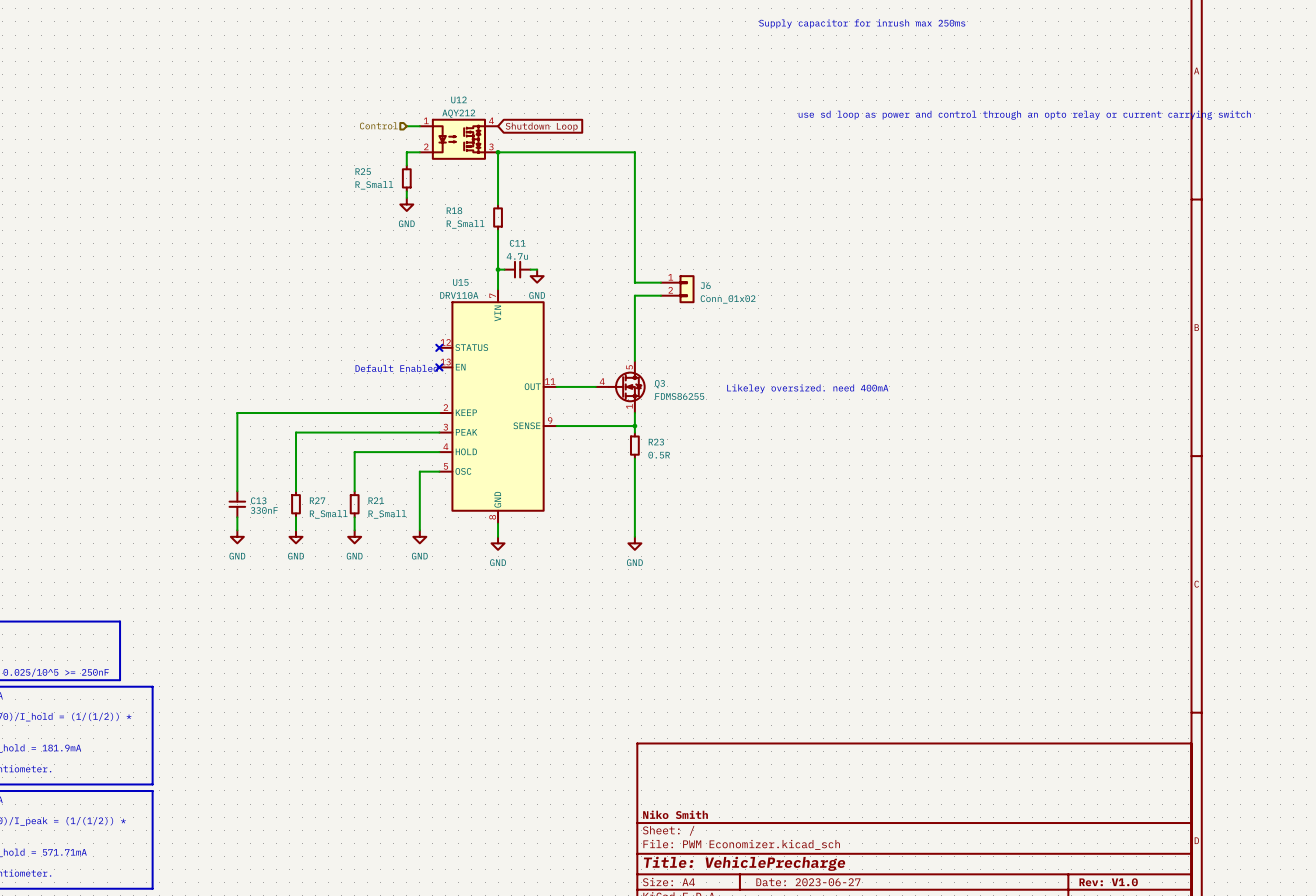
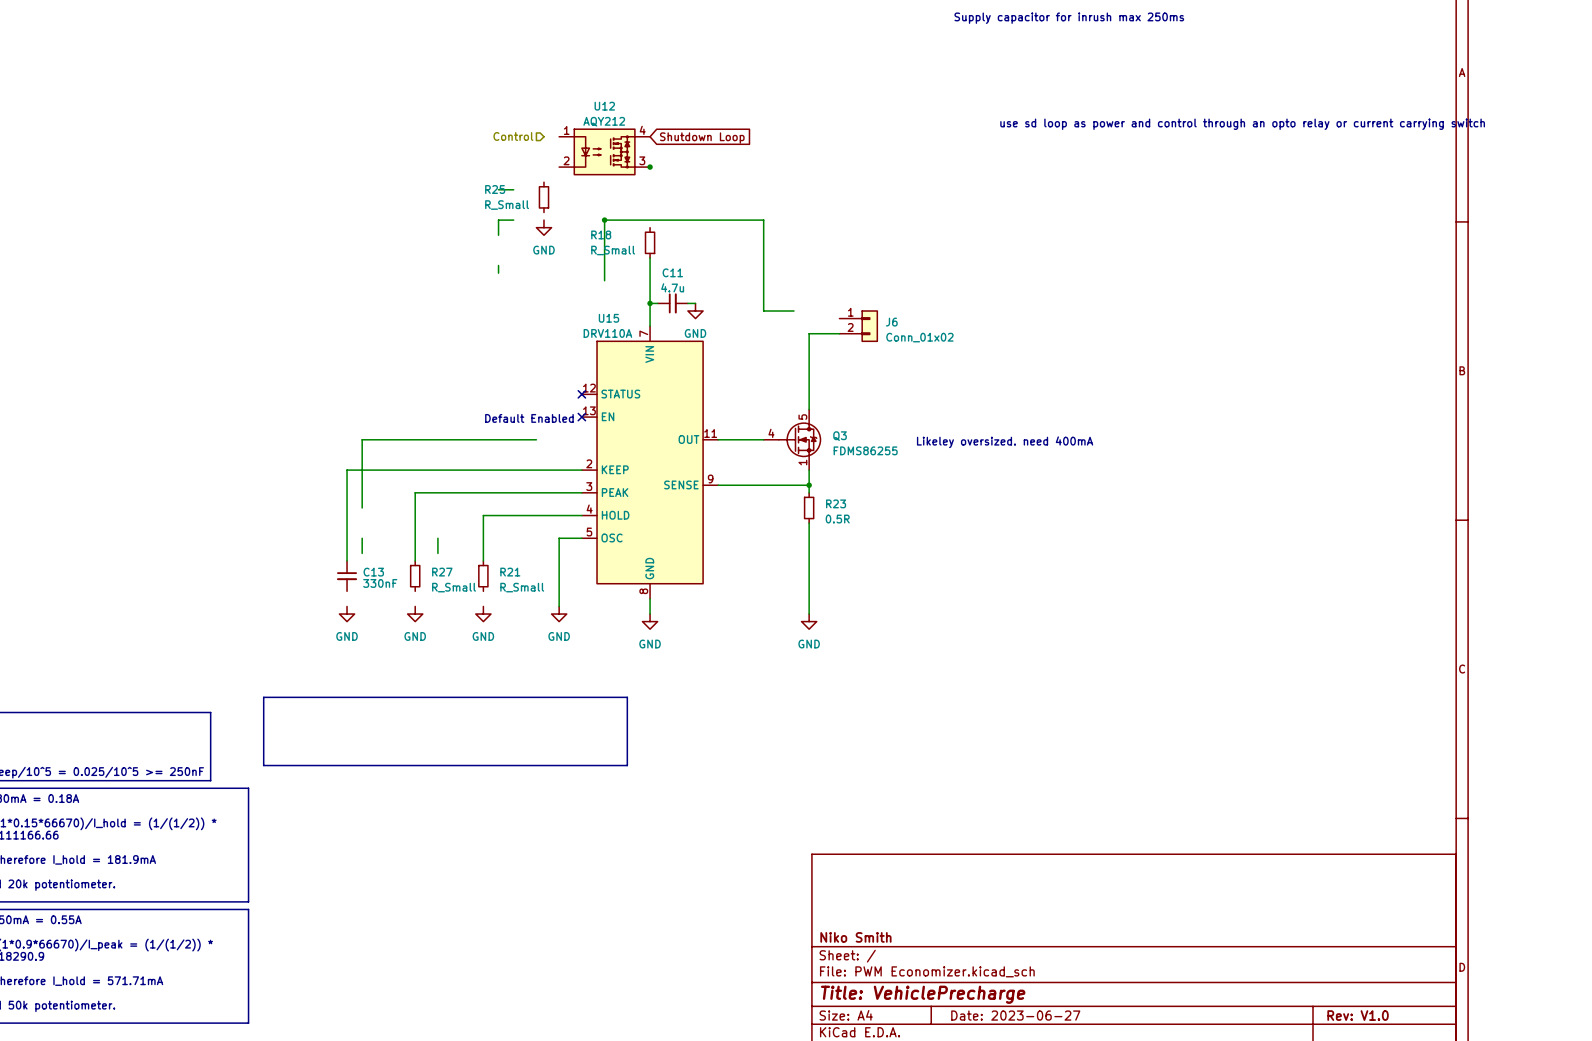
wire: (406, 126) (419, 126) -> (498, 189) (513, 189)
wire: (419, 152) (406, 152) (406, 165) -> (513, 220) (498, 220) (498, 235)
wire: (406, 191) (406, 197) -> (498, 265) (498, 273)
junction: none -> (604, 220)
wire: (498, 204) (498, 152) (634, 152) (634, 282) (660, 282) -> none
wire: none -> (604, 280) (604, 220) (763, 220) (763, 311) (793, 311)
wire: none -> (536, 439) (362, 439) (362, 507)
wire: (237, 517) (237, 530) -> (362, 538) (362, 553)
wire: (296, 517) (296, 530) -> (437, 538) (437, 553)
wire: (354, 517) (354, 530) -> none
line: none -> (263, 697) (627, 697) (627, 765) (263, 765) (263, 697)

